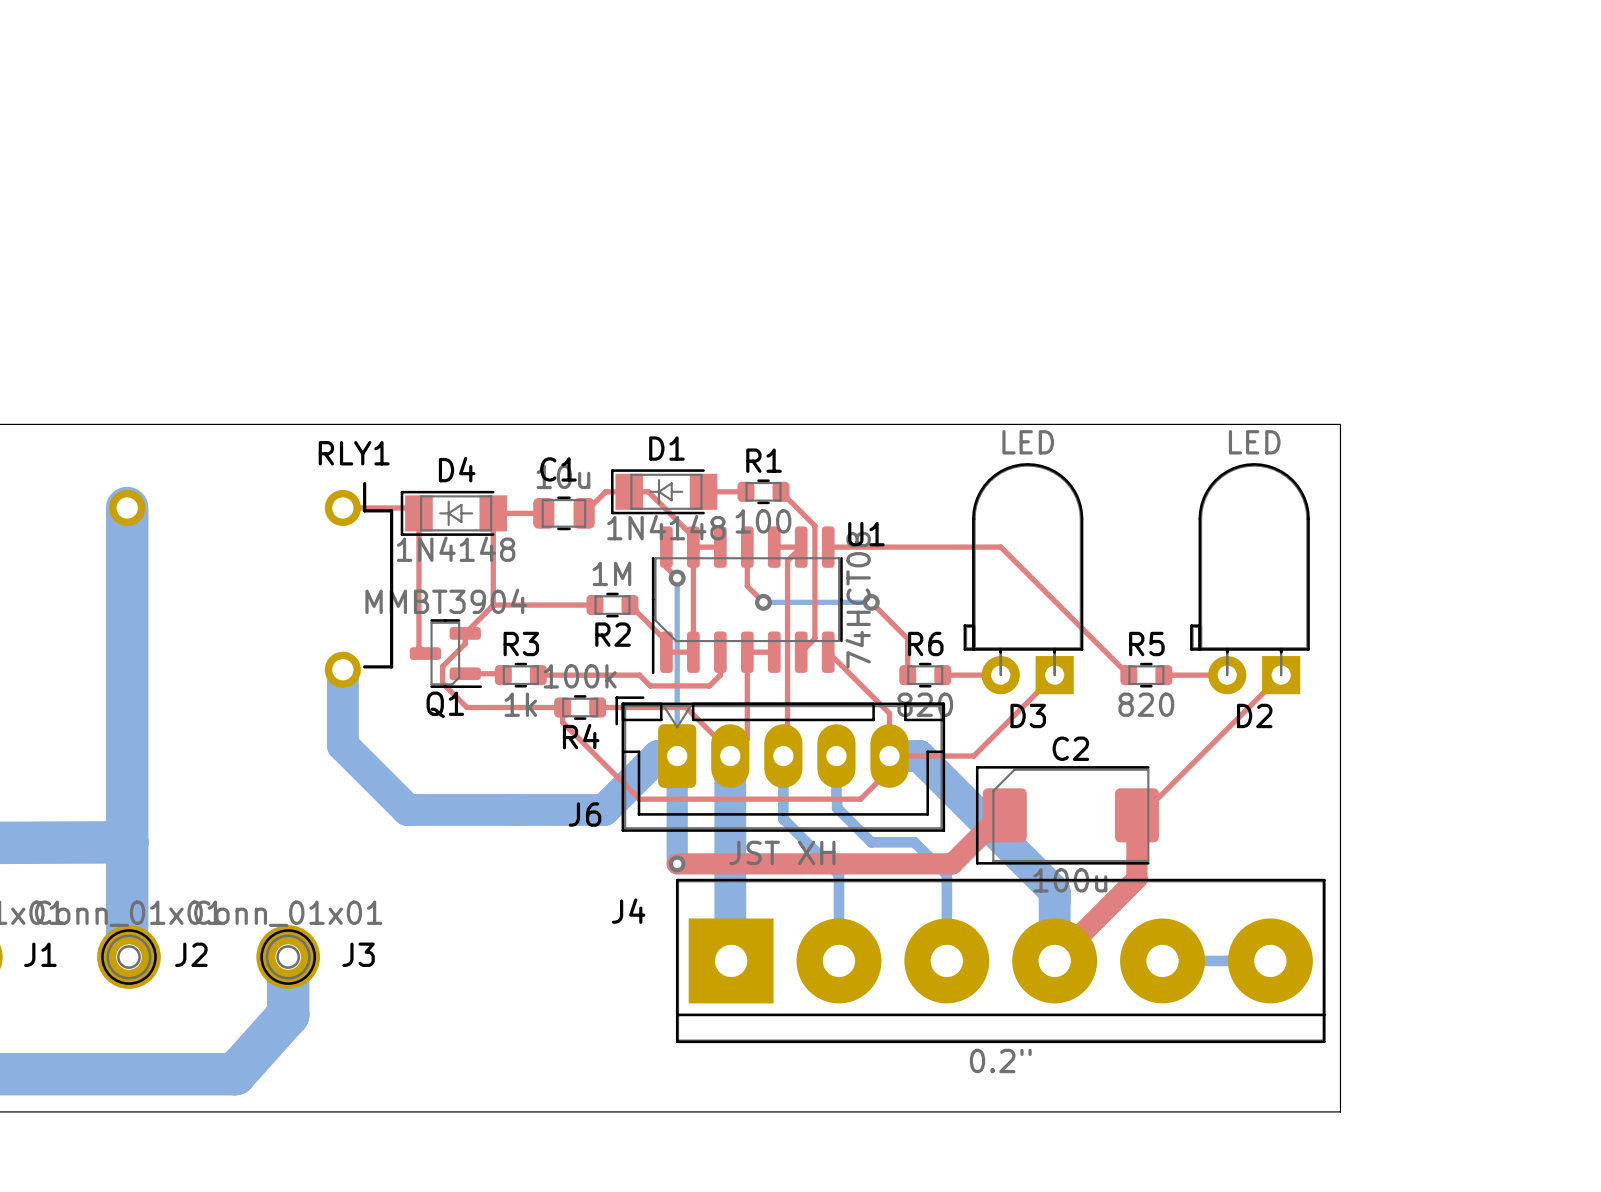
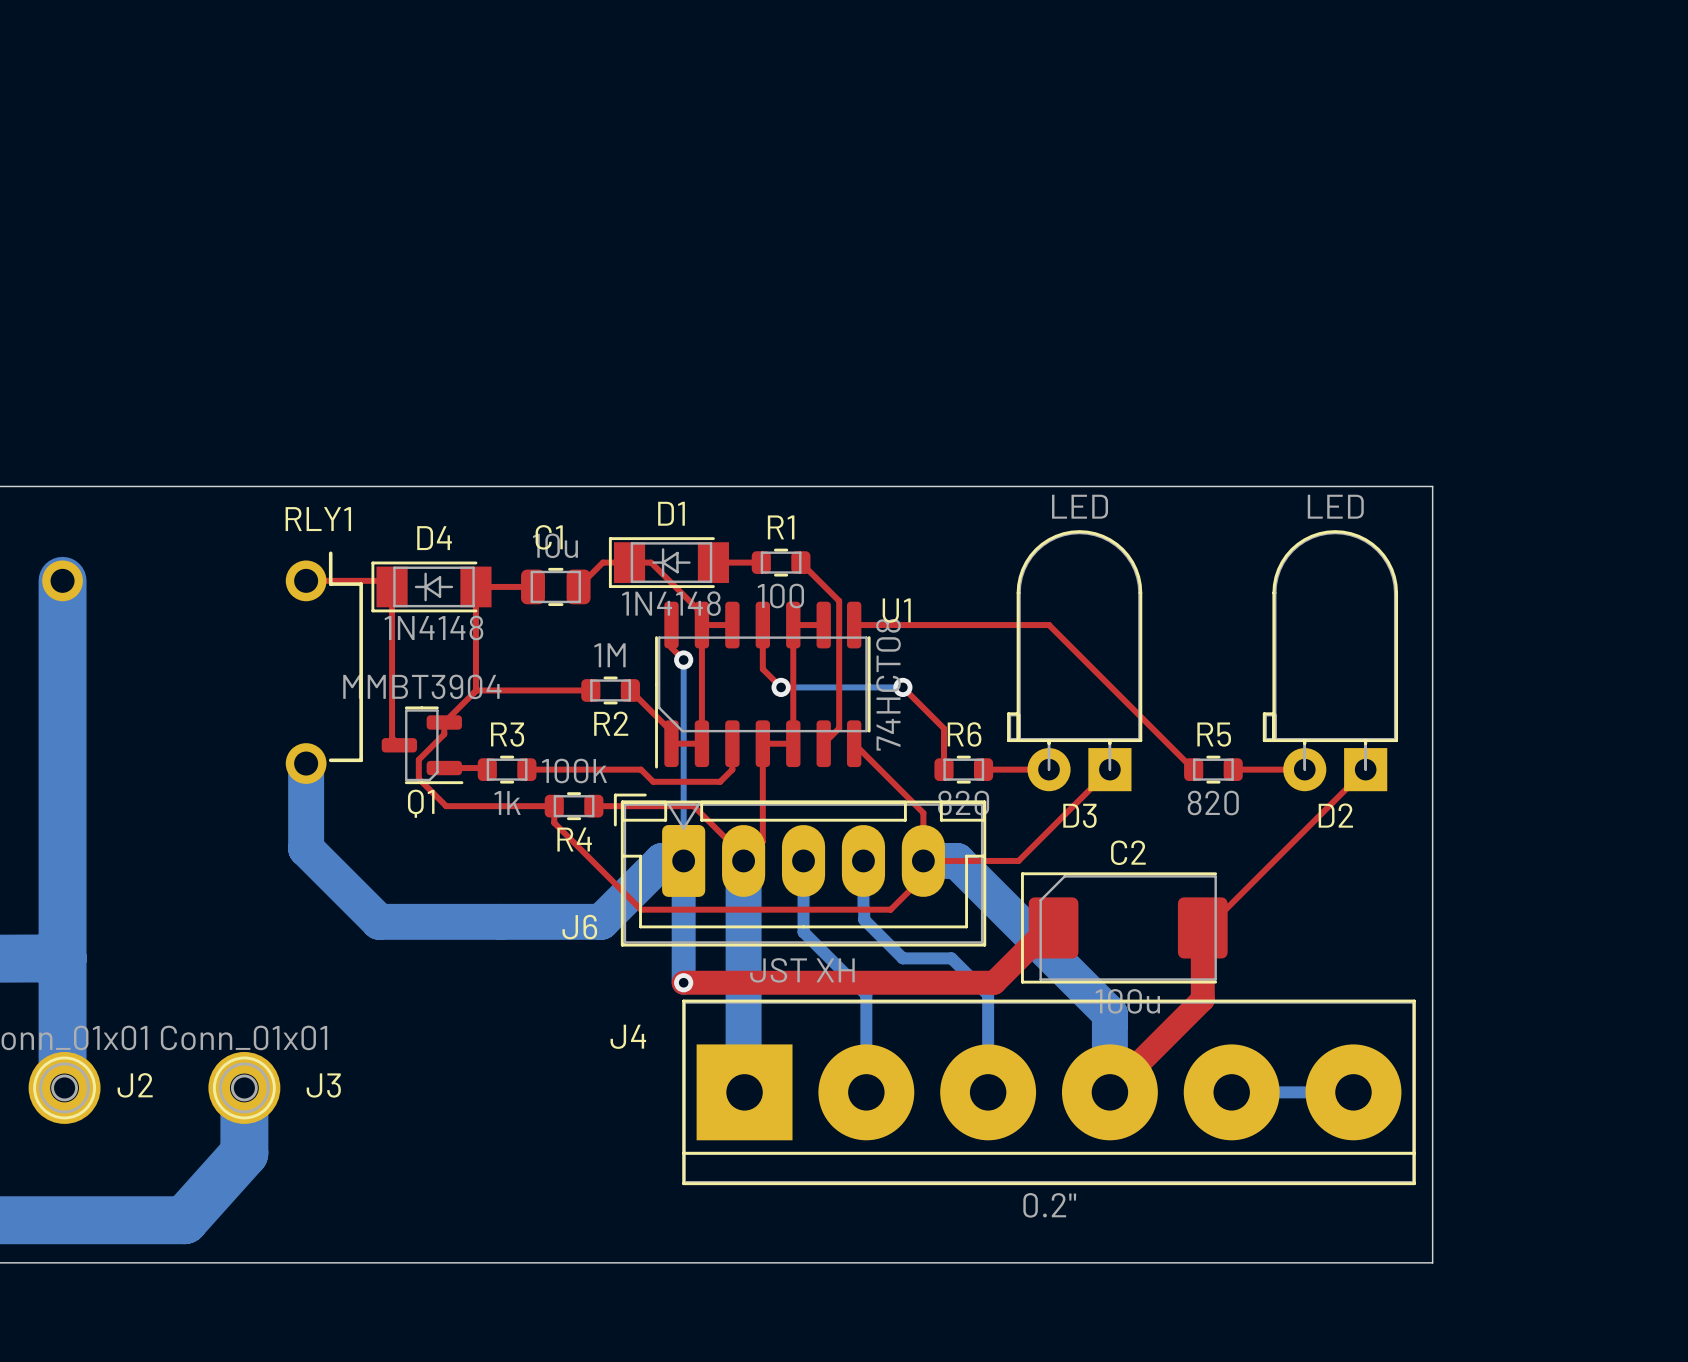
top track: none -> (793, 625) (793, 743)
top track: (801, 547) (787, 560) (787, 751) (783, 756) -> none

